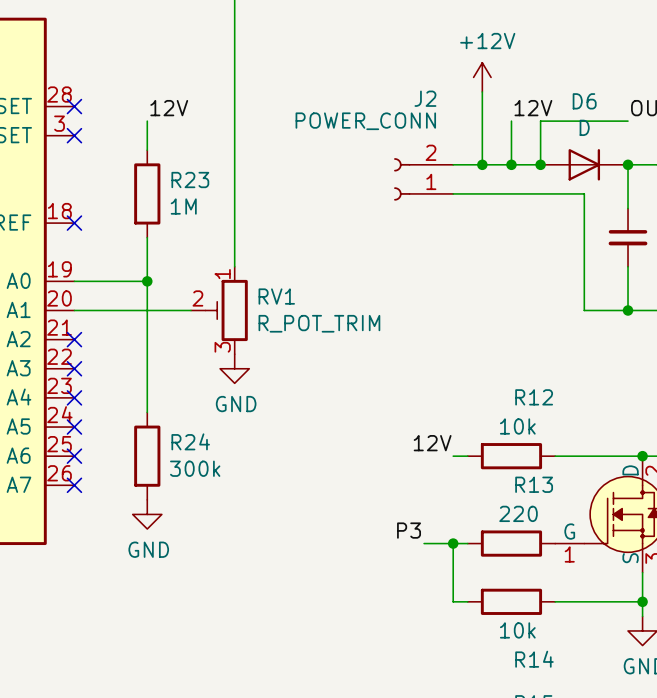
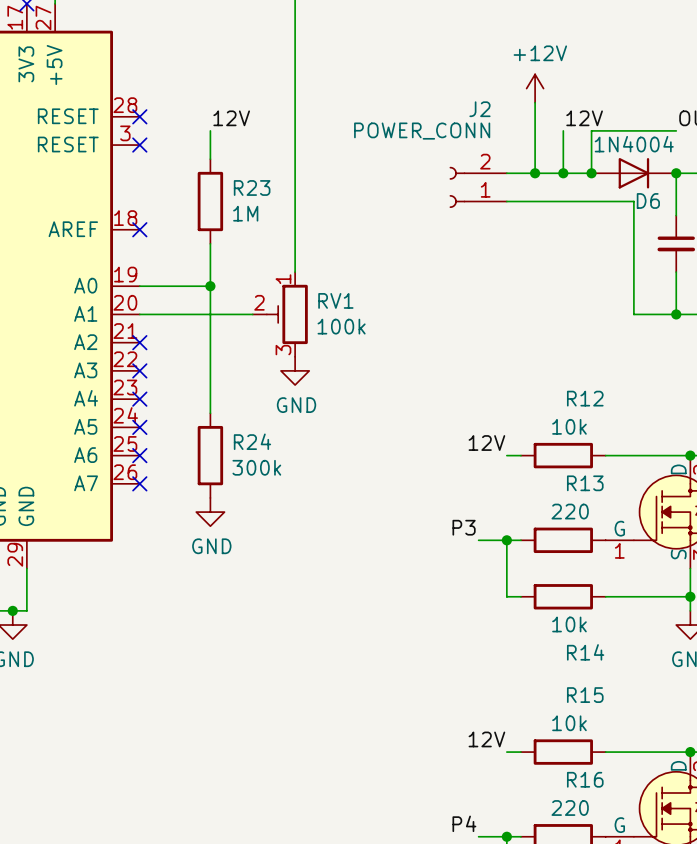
D6 name position: D6 (584, 101) -> D6 (648, 200)
D6 value: D (584, 127) -> 1N4004 (634, 144)
RV1 value: R_POT_TRIM (319, 323) -> 100k (341, 326)

